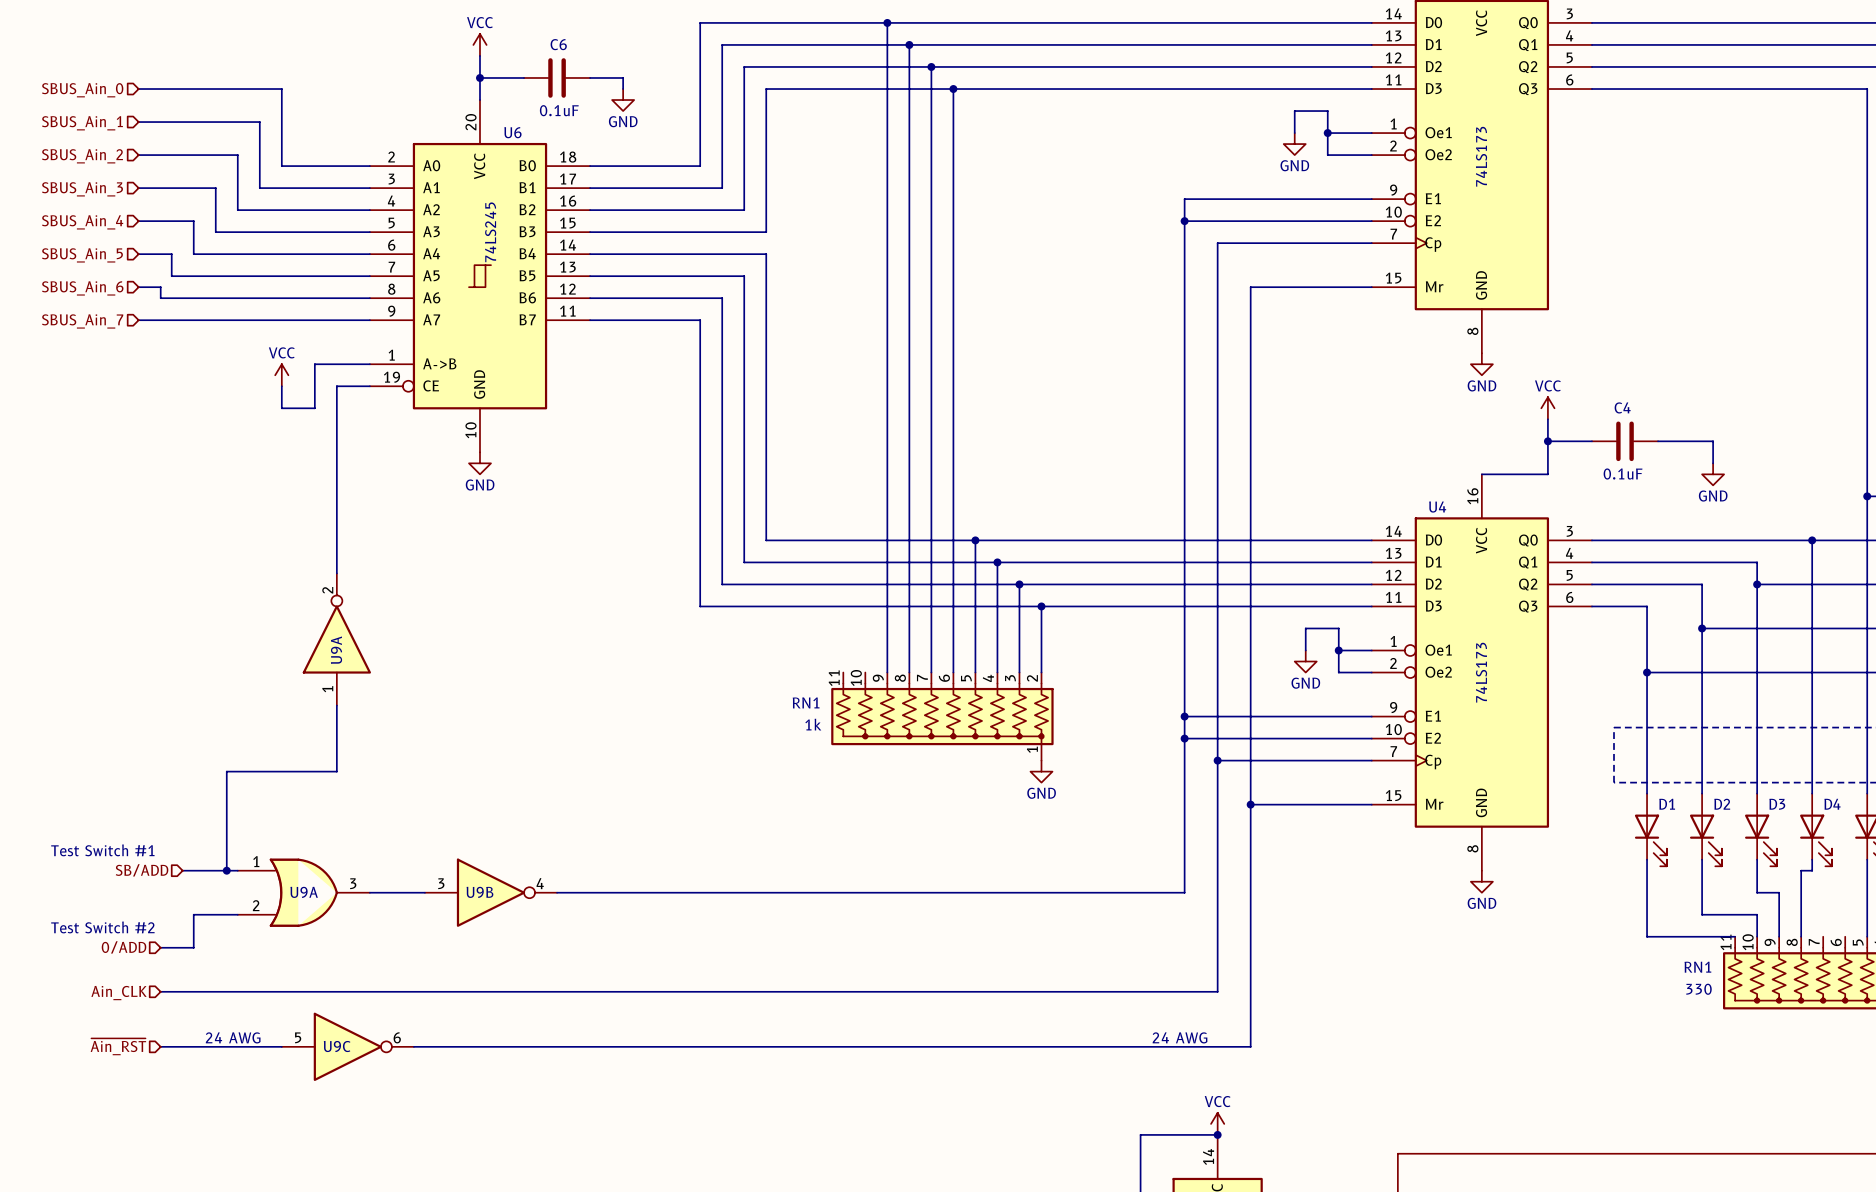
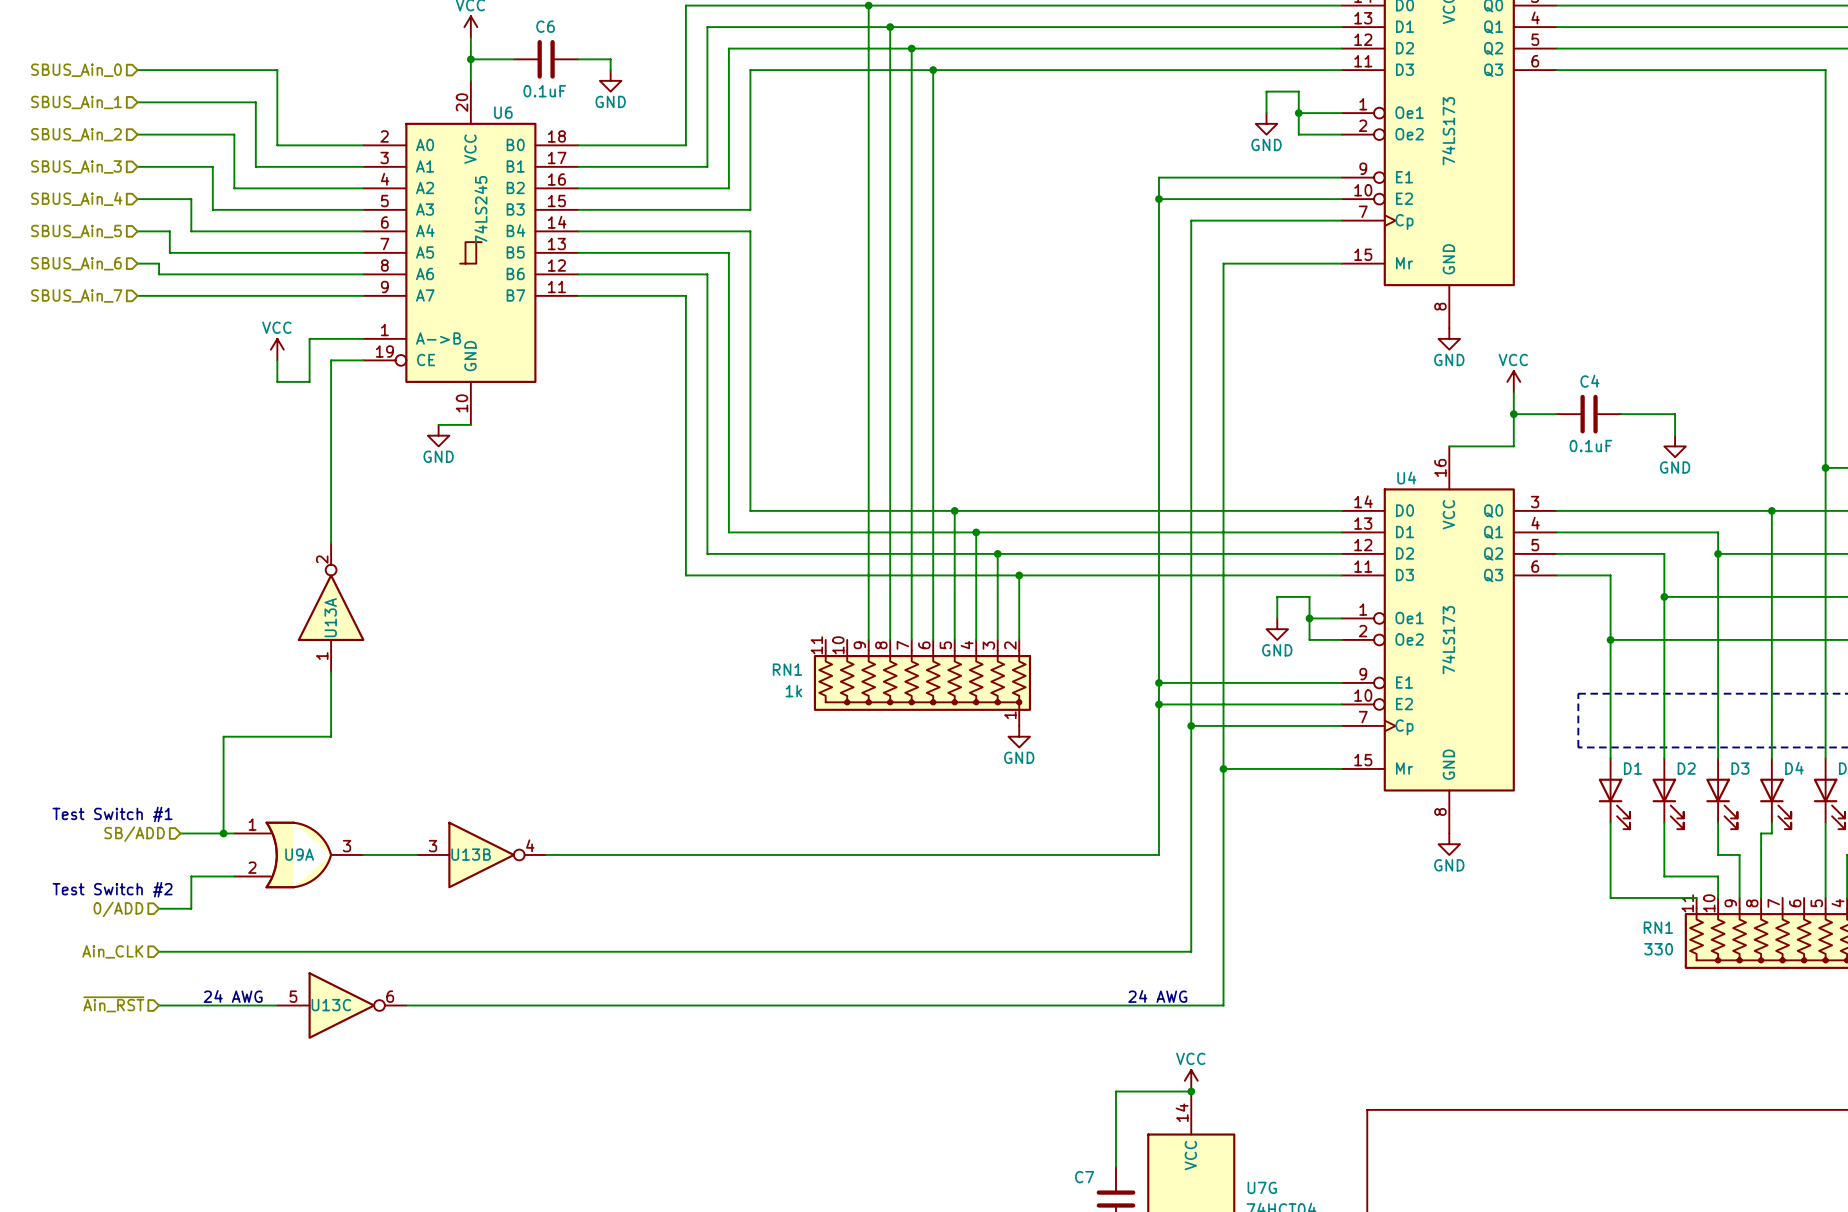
wire: none -> (438, 424) (470, 424)
power symbol position: GND (479, 463) -> GND (438, 435)
U9A name: U9A (336, 650) -> U13A (330, 617)
U9B name: U9B (479, 892) -> U13B (471, 854)
U9C name: U9C (337, 1046) -> U13C (331, 1005)

